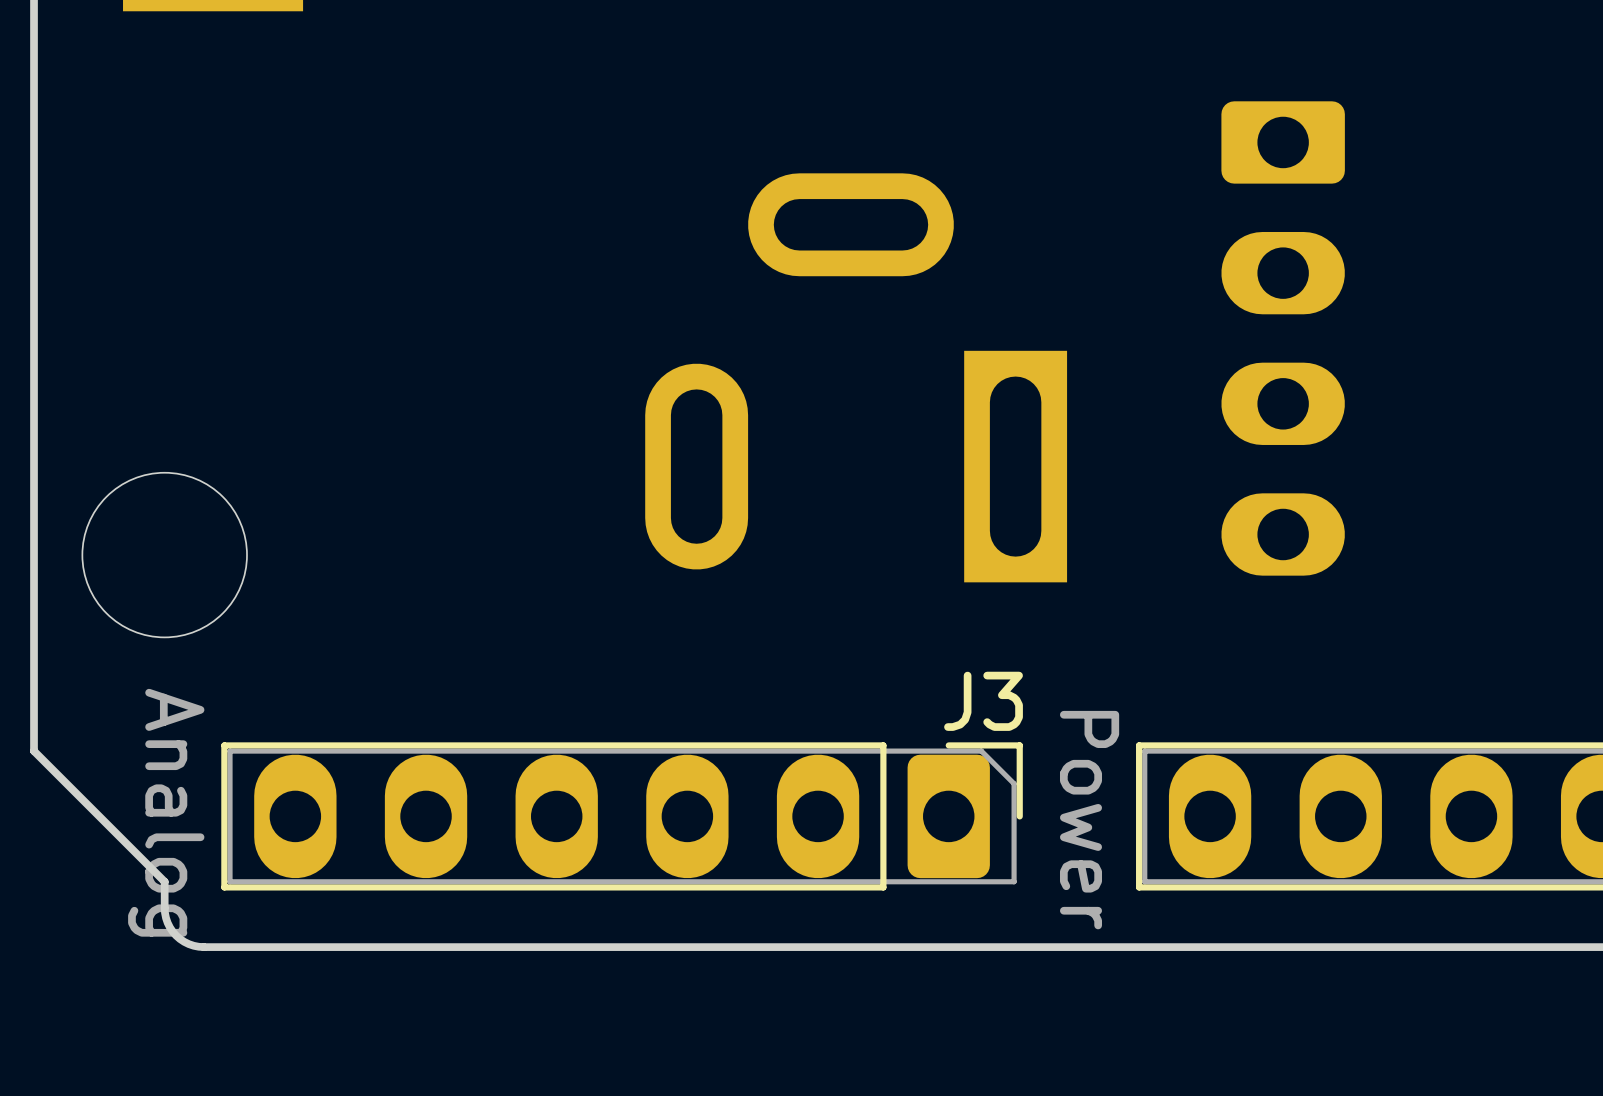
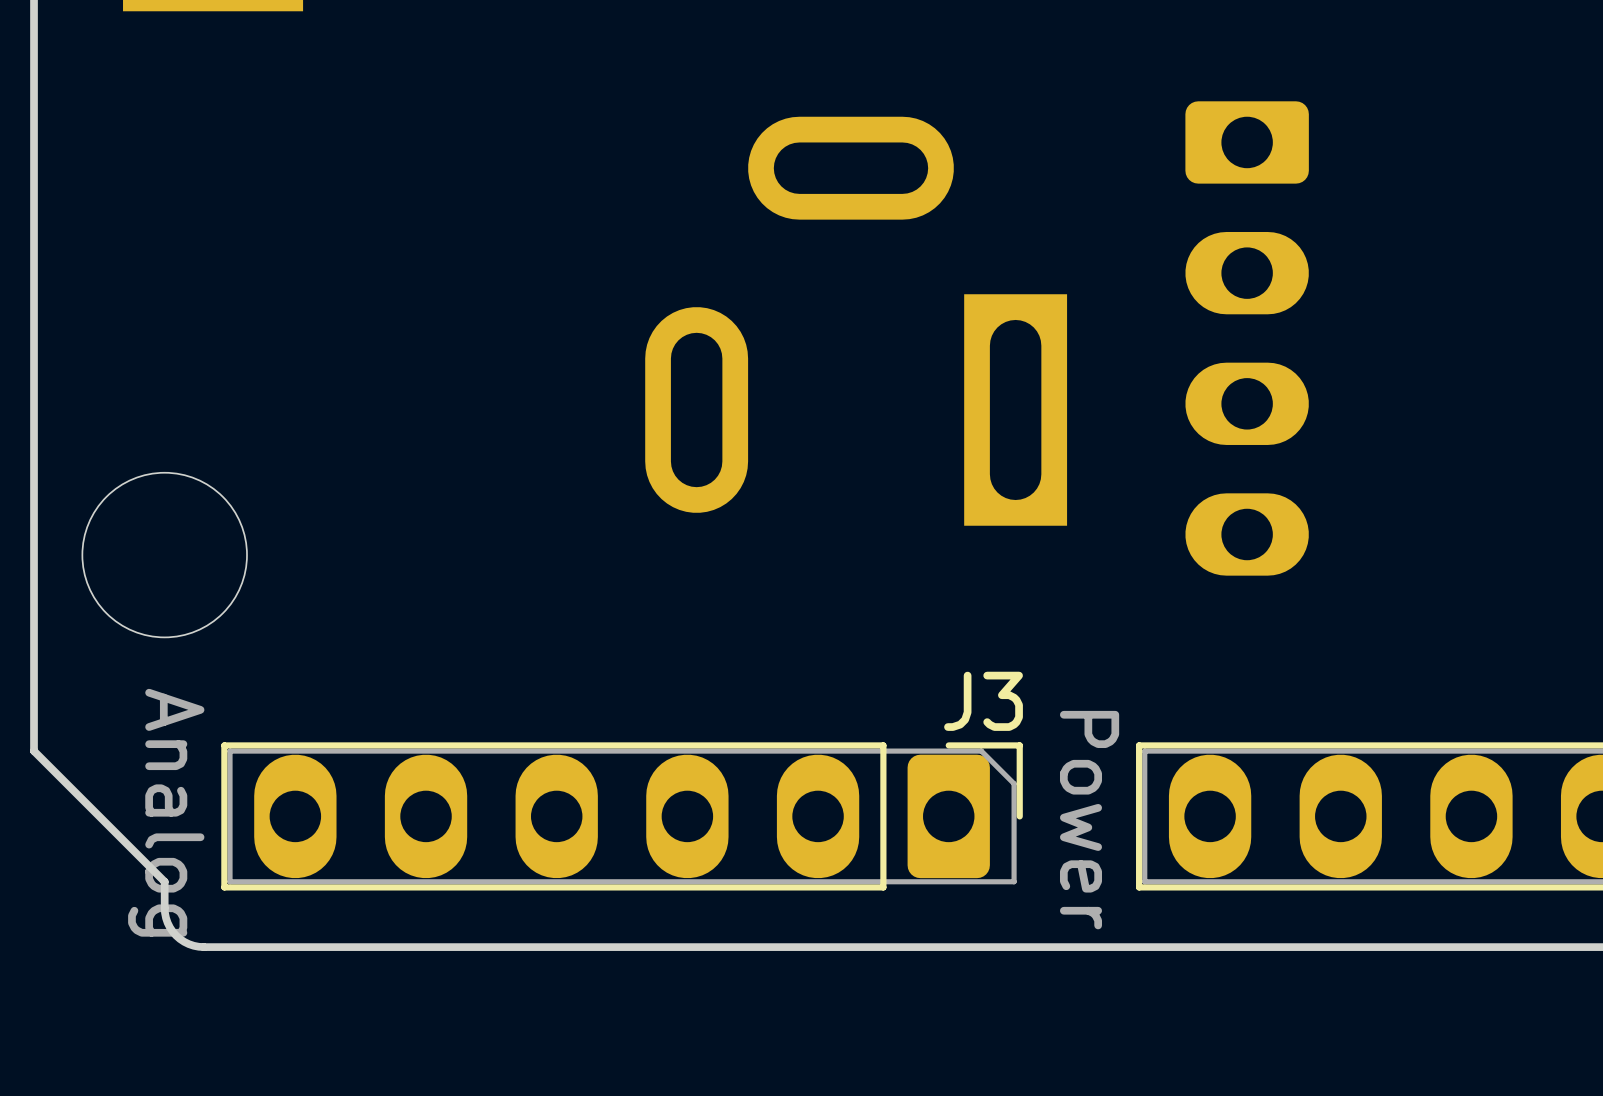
part position: (1283, 338) -> (1247, 338)
part position: (856, 377) -> (856, 321)

